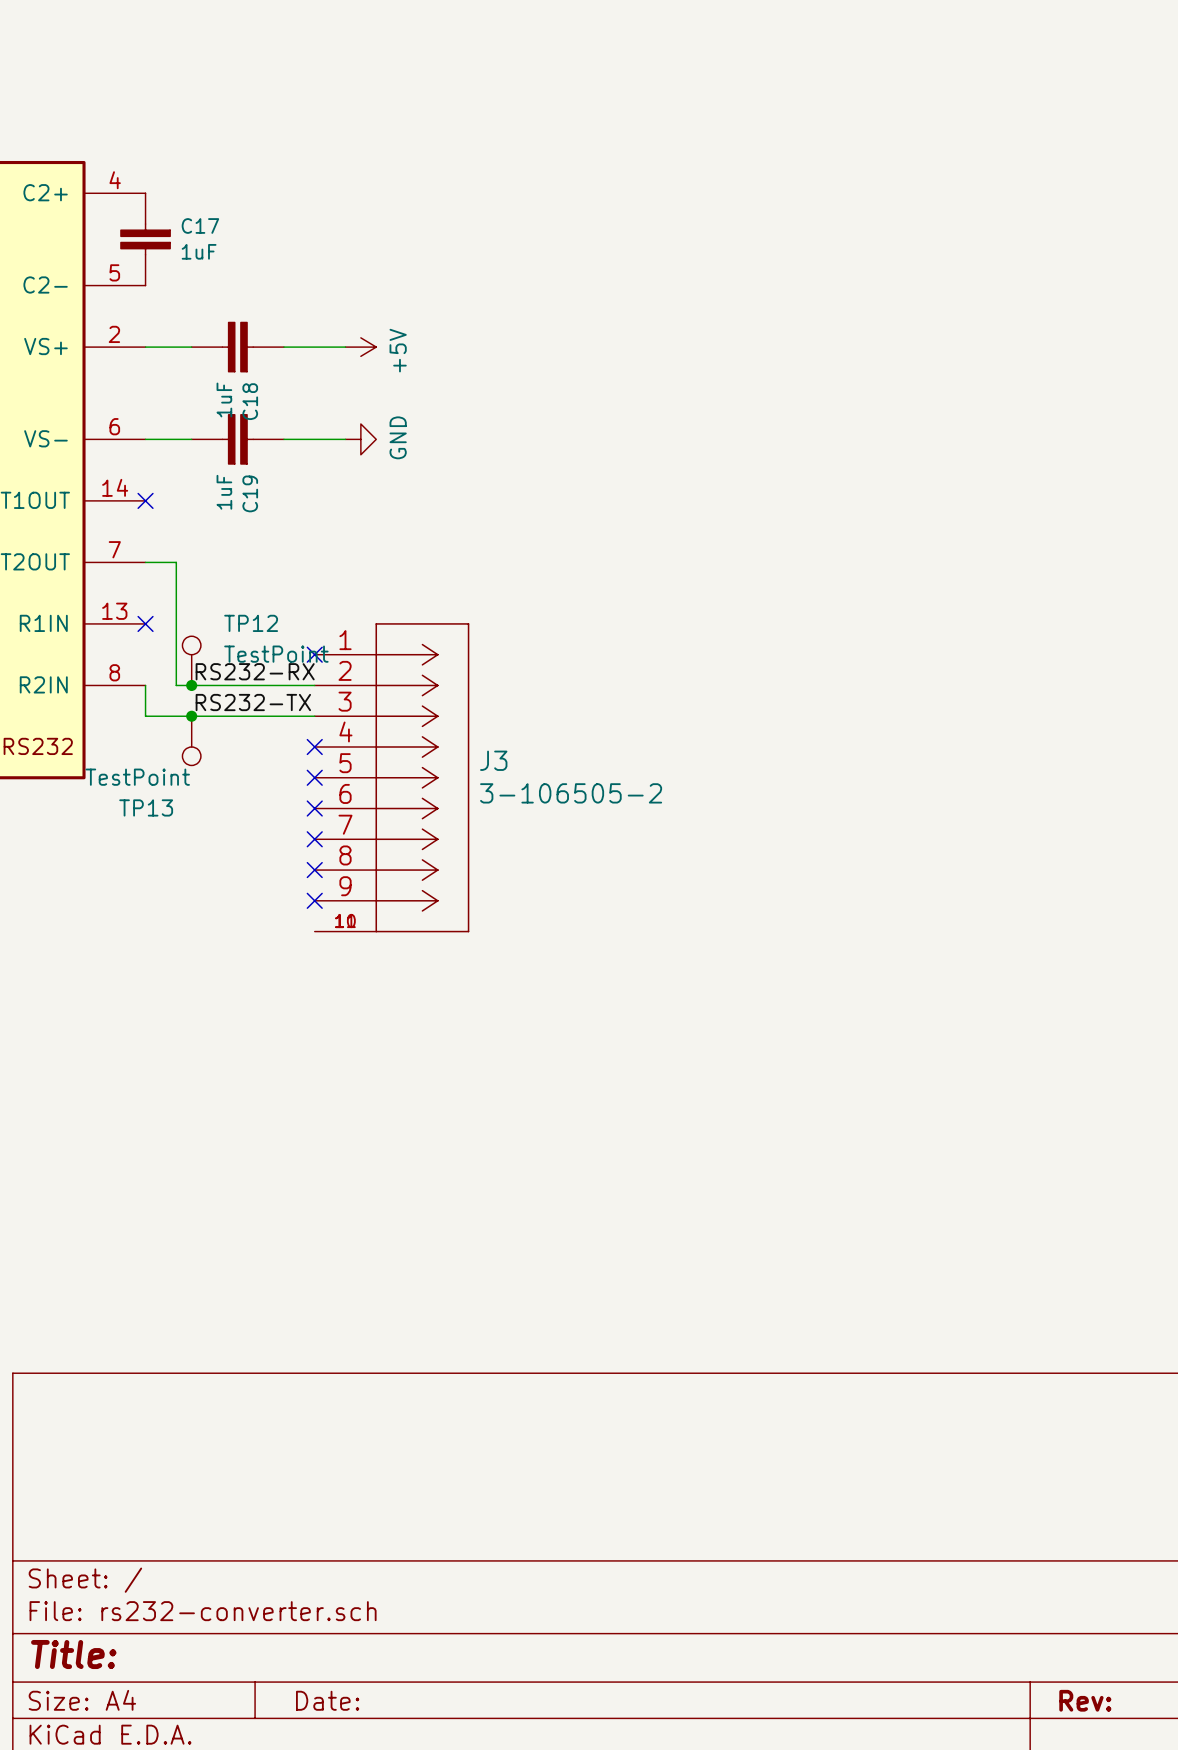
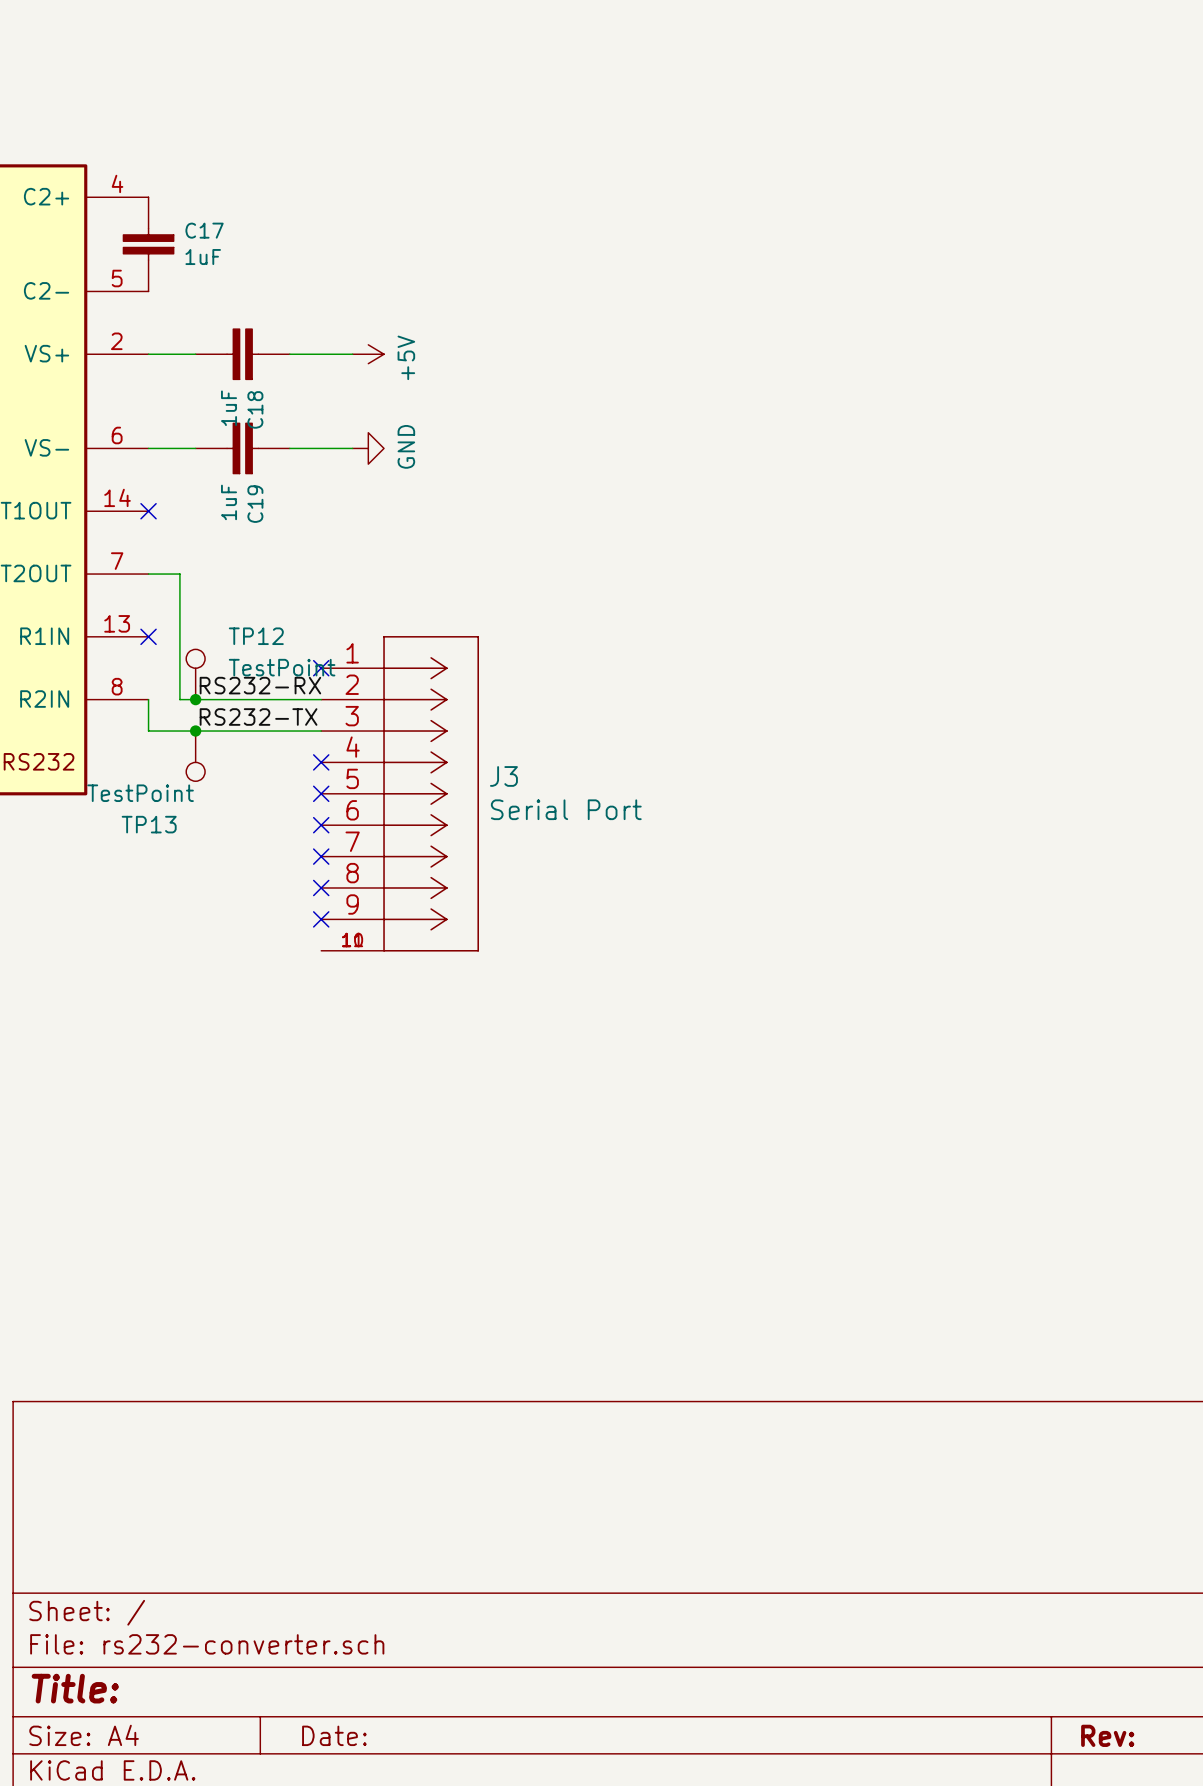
J3 value: 3-106505-2 (571, 793) -> Serial Port (566, 809)

